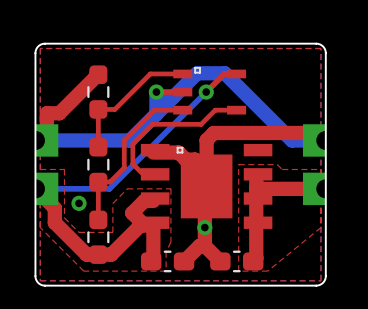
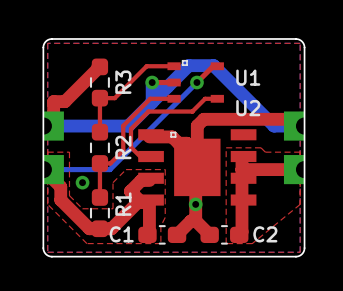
U1: none -> (195, 81)
part: (209, 90) -> none
R3 name: none -> R3 (123, 82)
U2 name: none -> U2 (248, 108)
R2 name: none -> R2 (123, 147)
R1 name: none -> R1 (123, 204)
C1 name: none -> C1 (121, 234)
C2 name: none -> C2 (265, 234)

